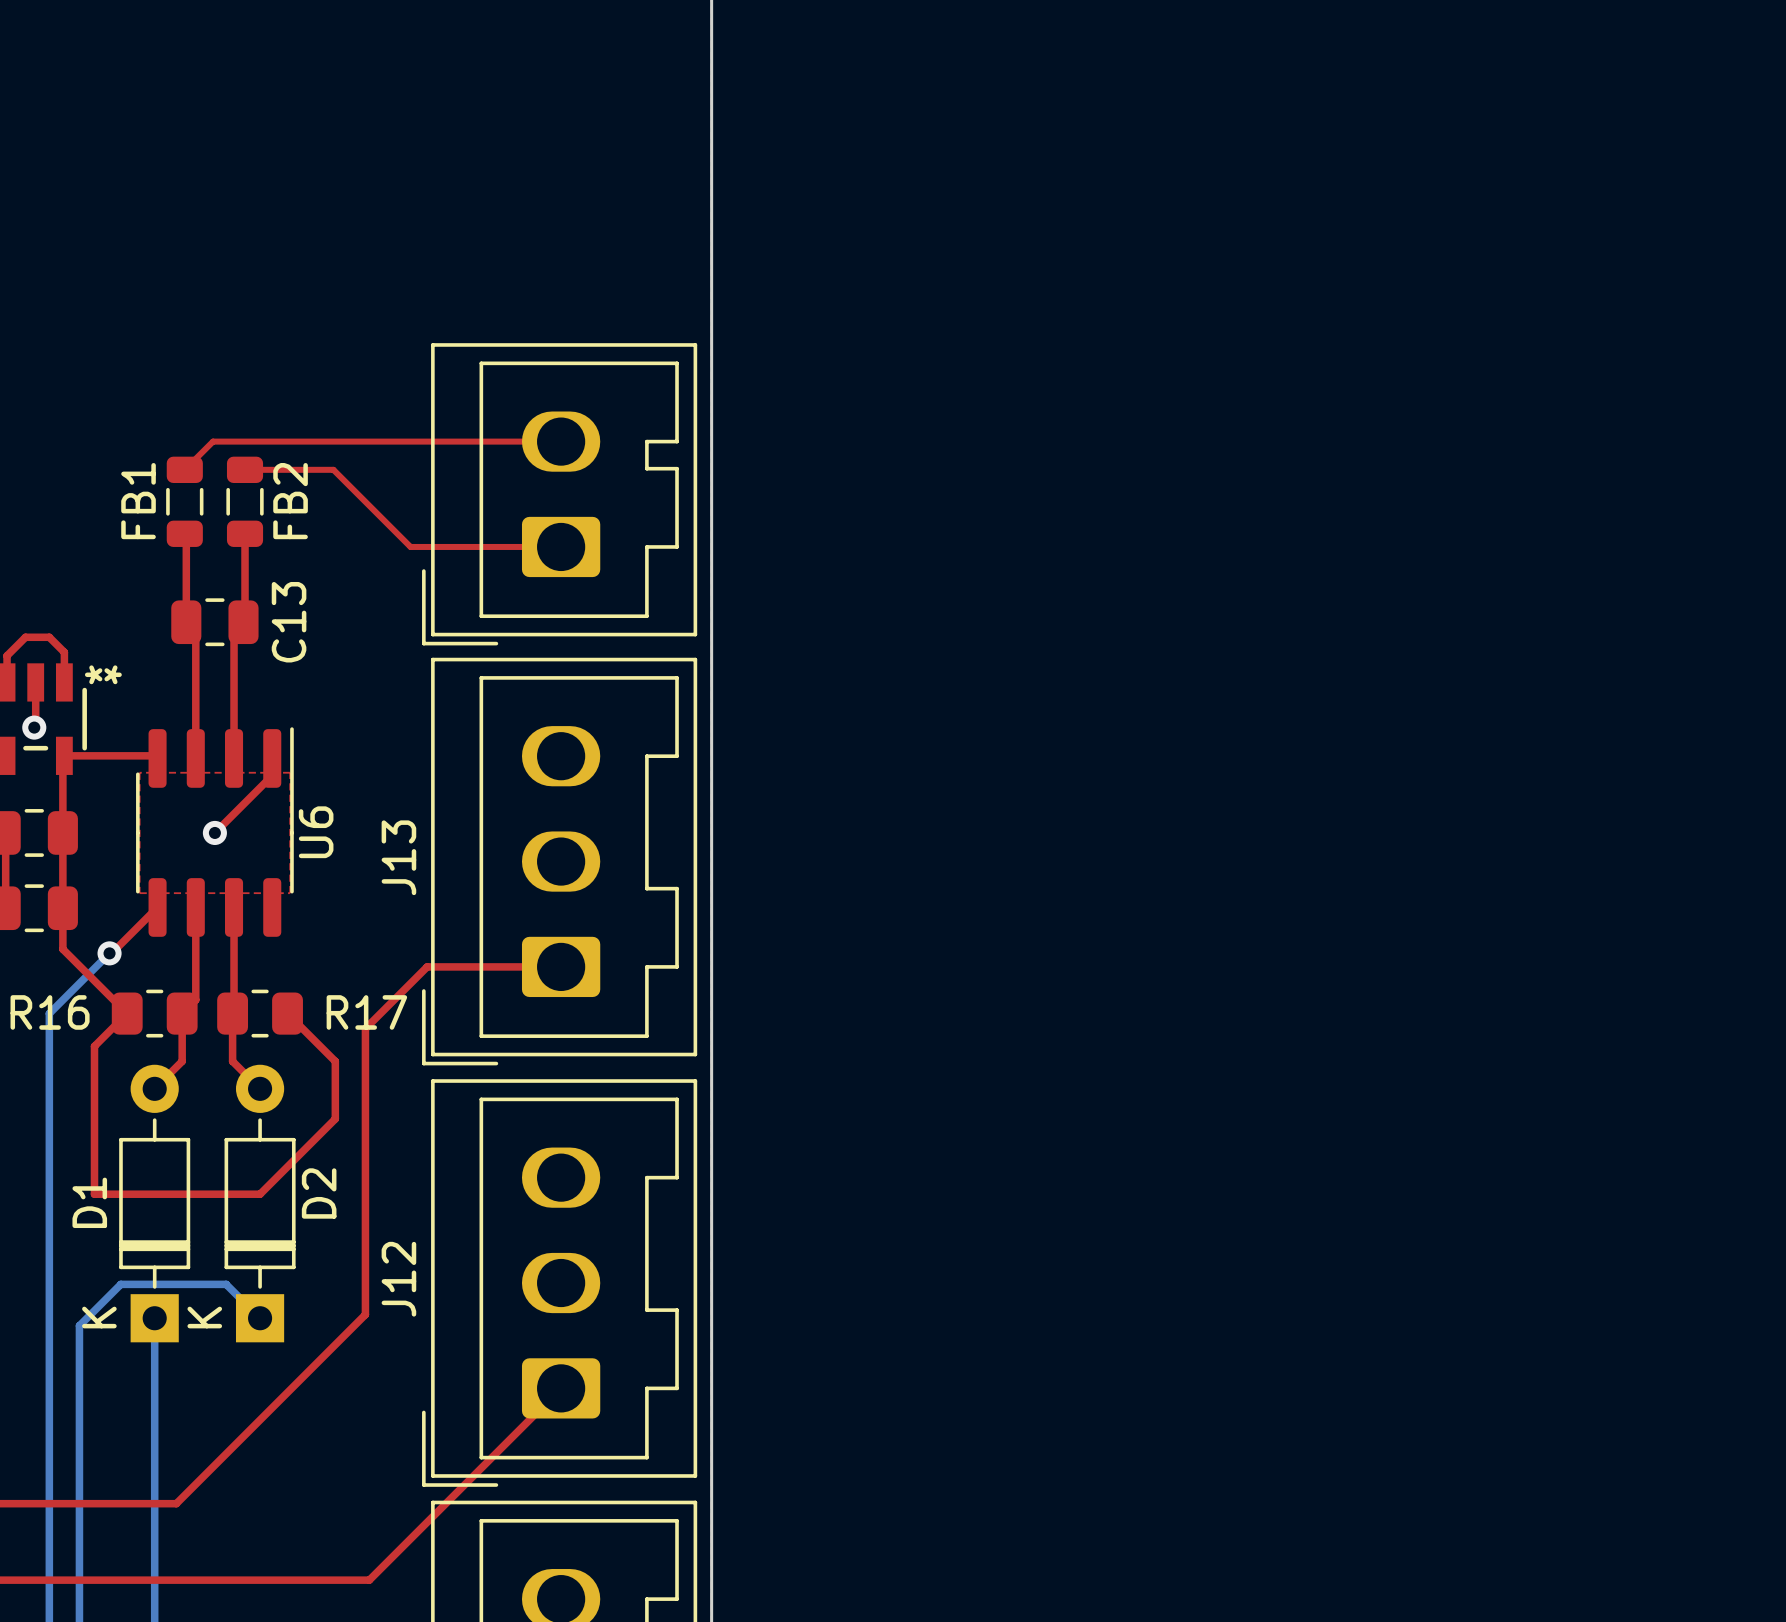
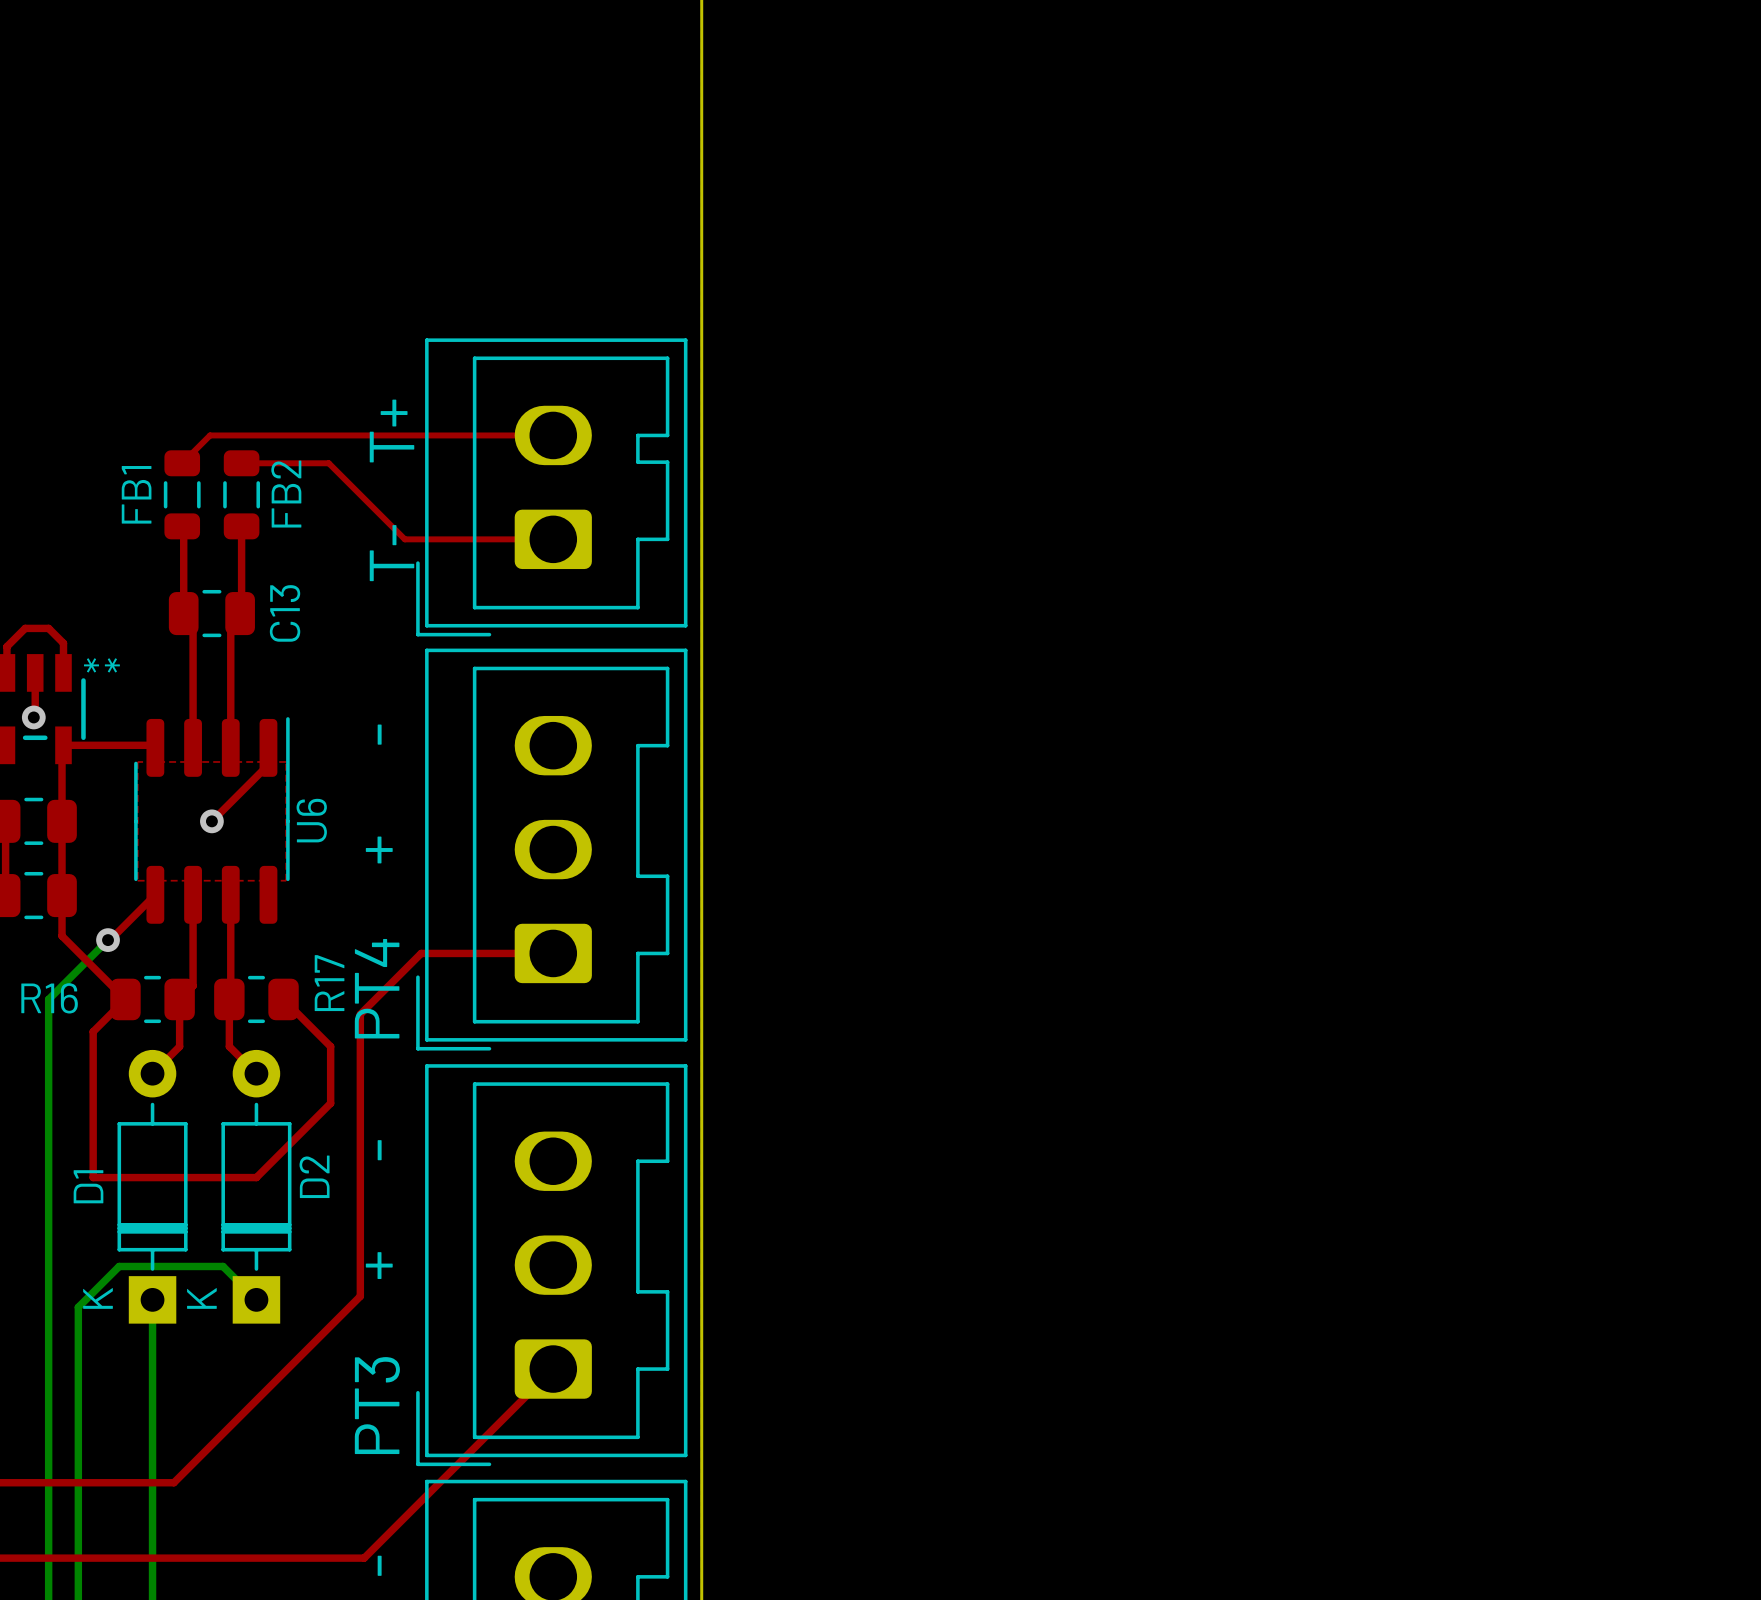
text: none -> T+ (392, 431)
text: none -> T- (392, 553)
text: none -> - (379, 734)
text: none -> + (379, 849)
J13 name: J13 (398, 857) -> none
text: none -> PT4 (377, 988)
R17 name rotation: 0° (366, 1012) -> 90° counterclockwise (329, 983)
text: none -> - (379, 1150)
text: none -> + (379, 1265)
J12 name: J12 (398, 1279) -> none
text: none -> PT3 (377, 1405)
text: none -> - (379, 1565)

